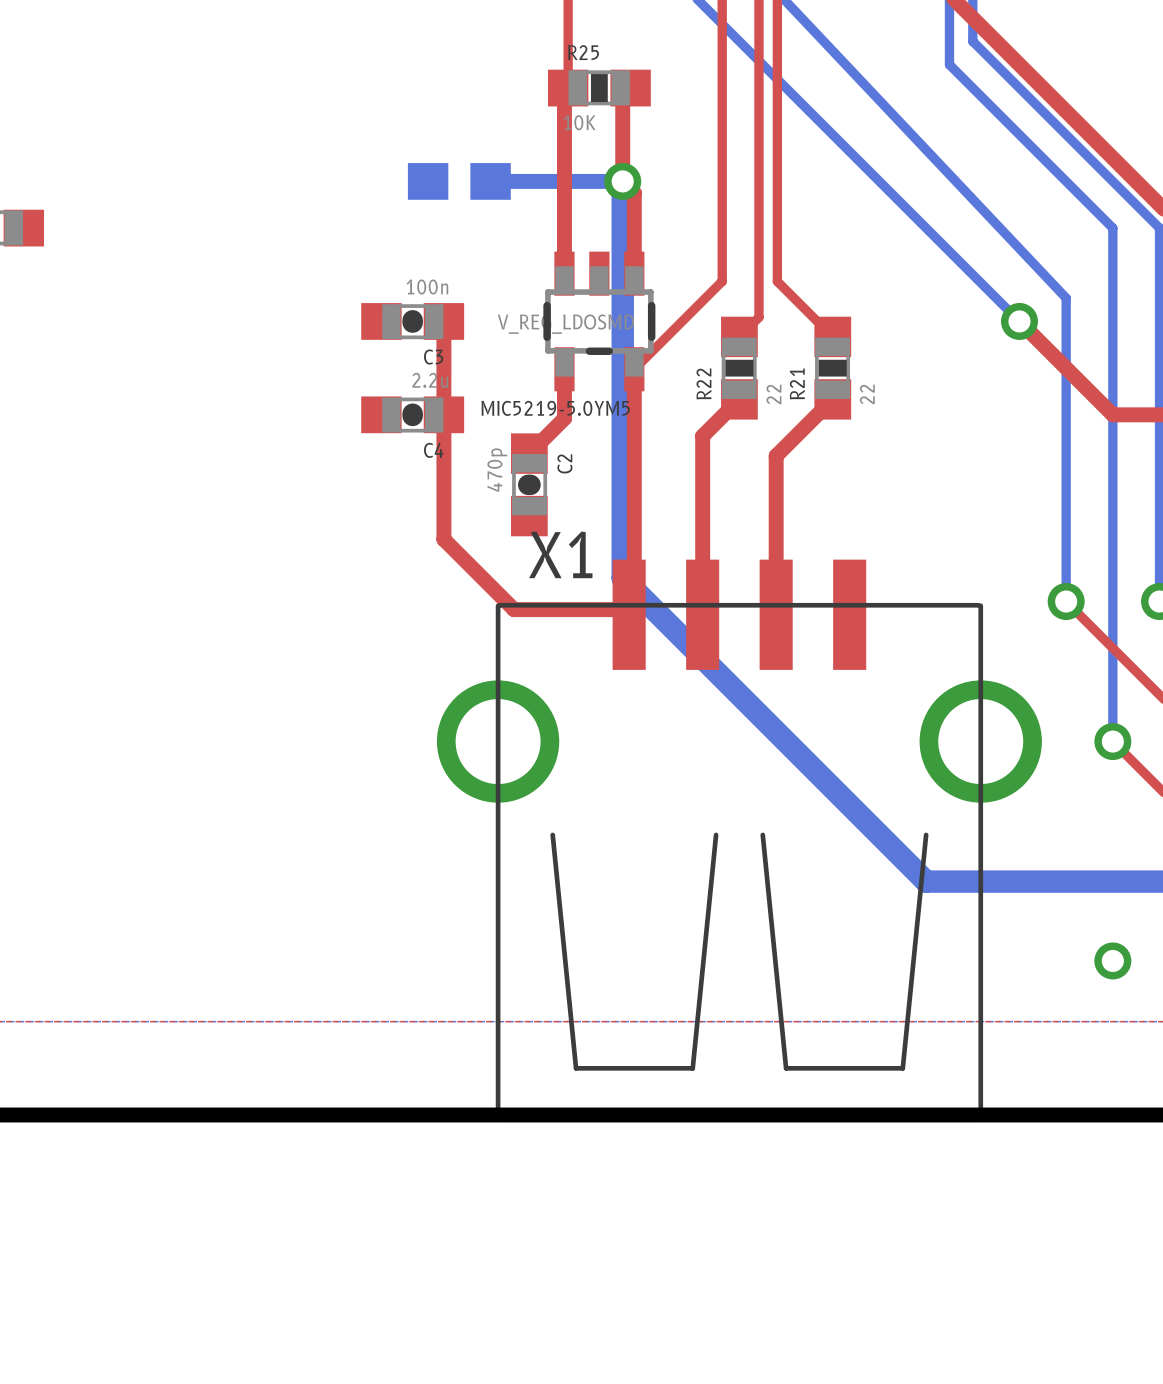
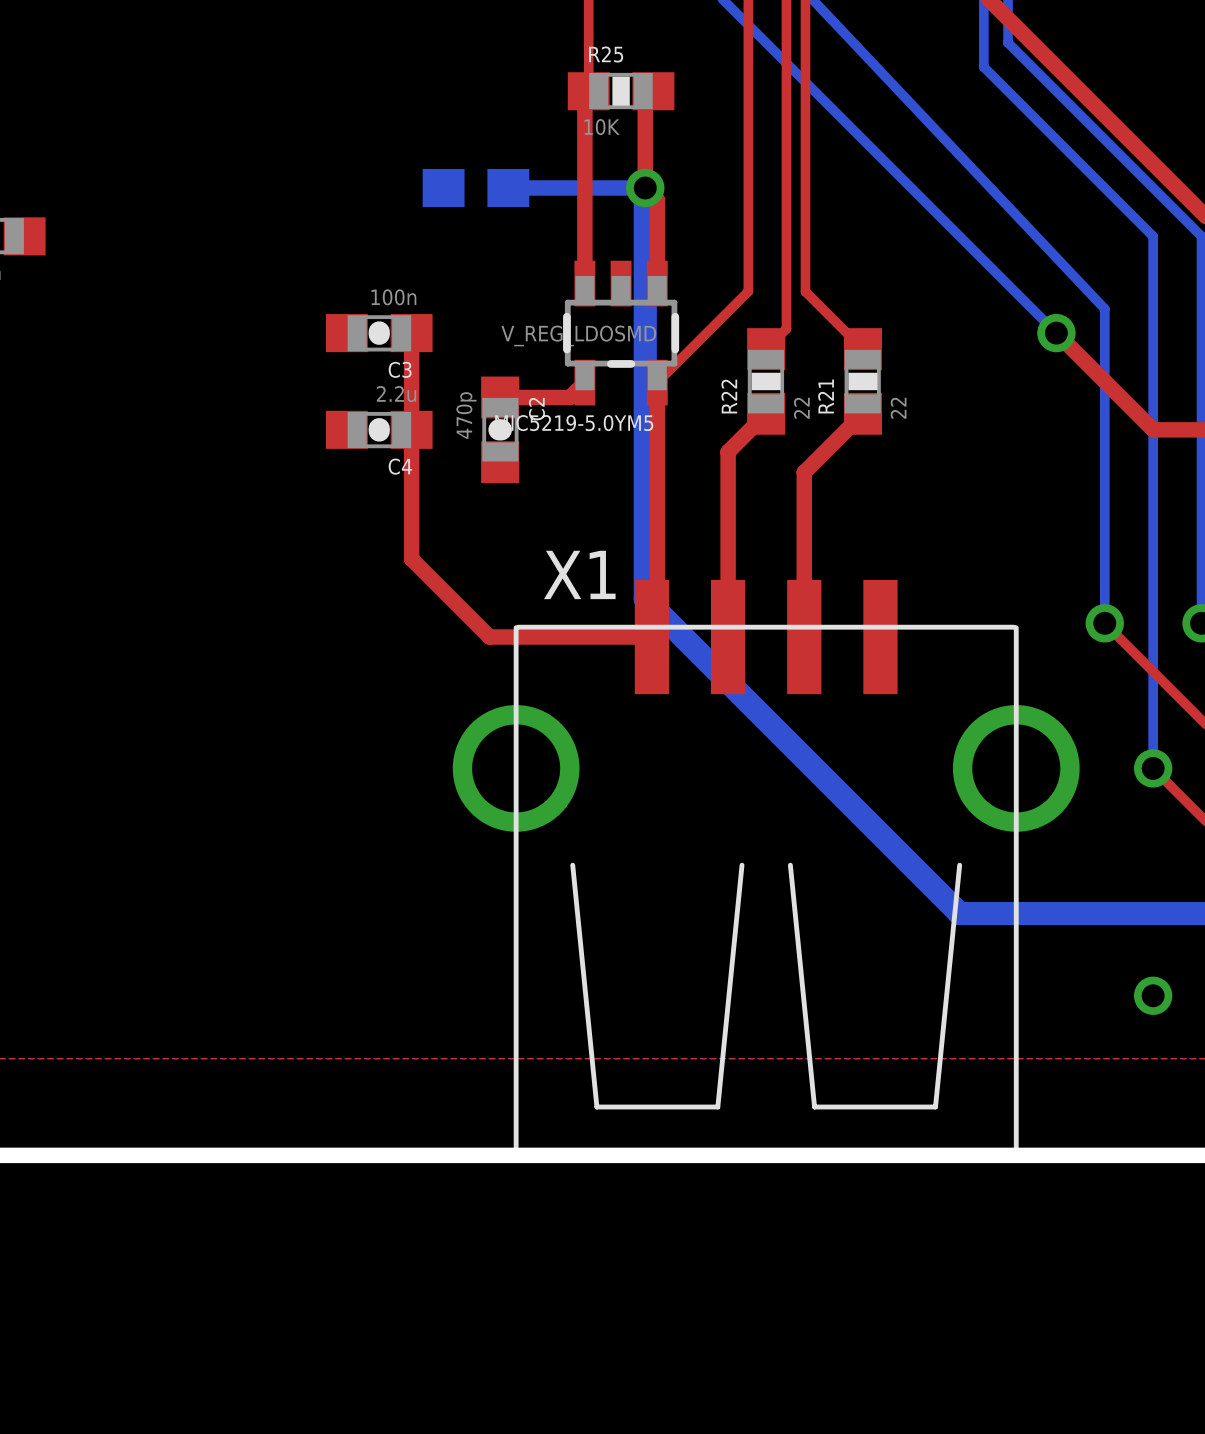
top track: none -> (411, 333) (411, 558) (489, 637) (651, 637)
C3 position: (412, 321) -> (379, 333)
top track: (443, 321) (443, 539) (514, 609) (634, 609) -> none
top track: (564, 369) (564, 418) (529, 453) -> (584, 382) (570, 397) (500, 397)
C4 position: (412, 414) -> (379, 429)
C2 position: (529, 484) -> (500, 429)

